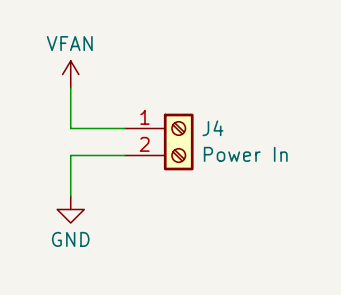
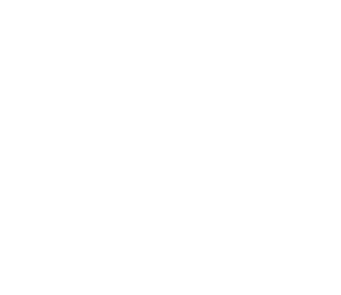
power symbol: VFAN (70, 74) -> none
wire: (70, 88) (70, 128) (124, 128) -> none
J4: Power In (159, 142) -> none
wire: (124, 155) (70, 155) (70, 196) -> none
power symbol: GND (70, 209) -> none

